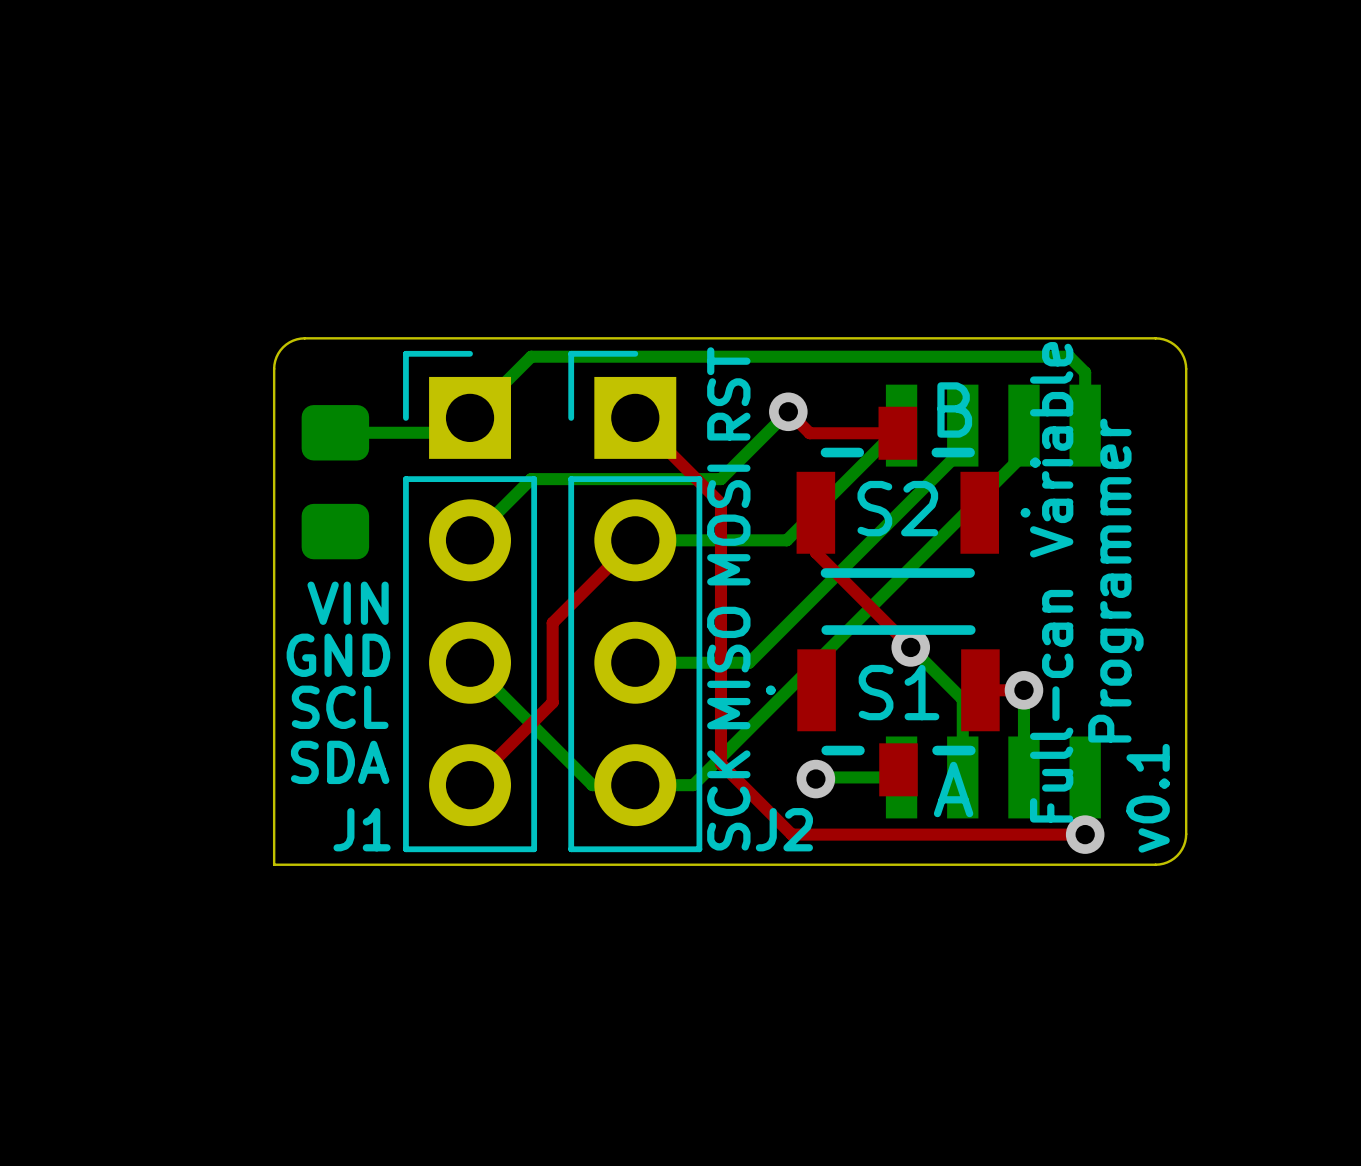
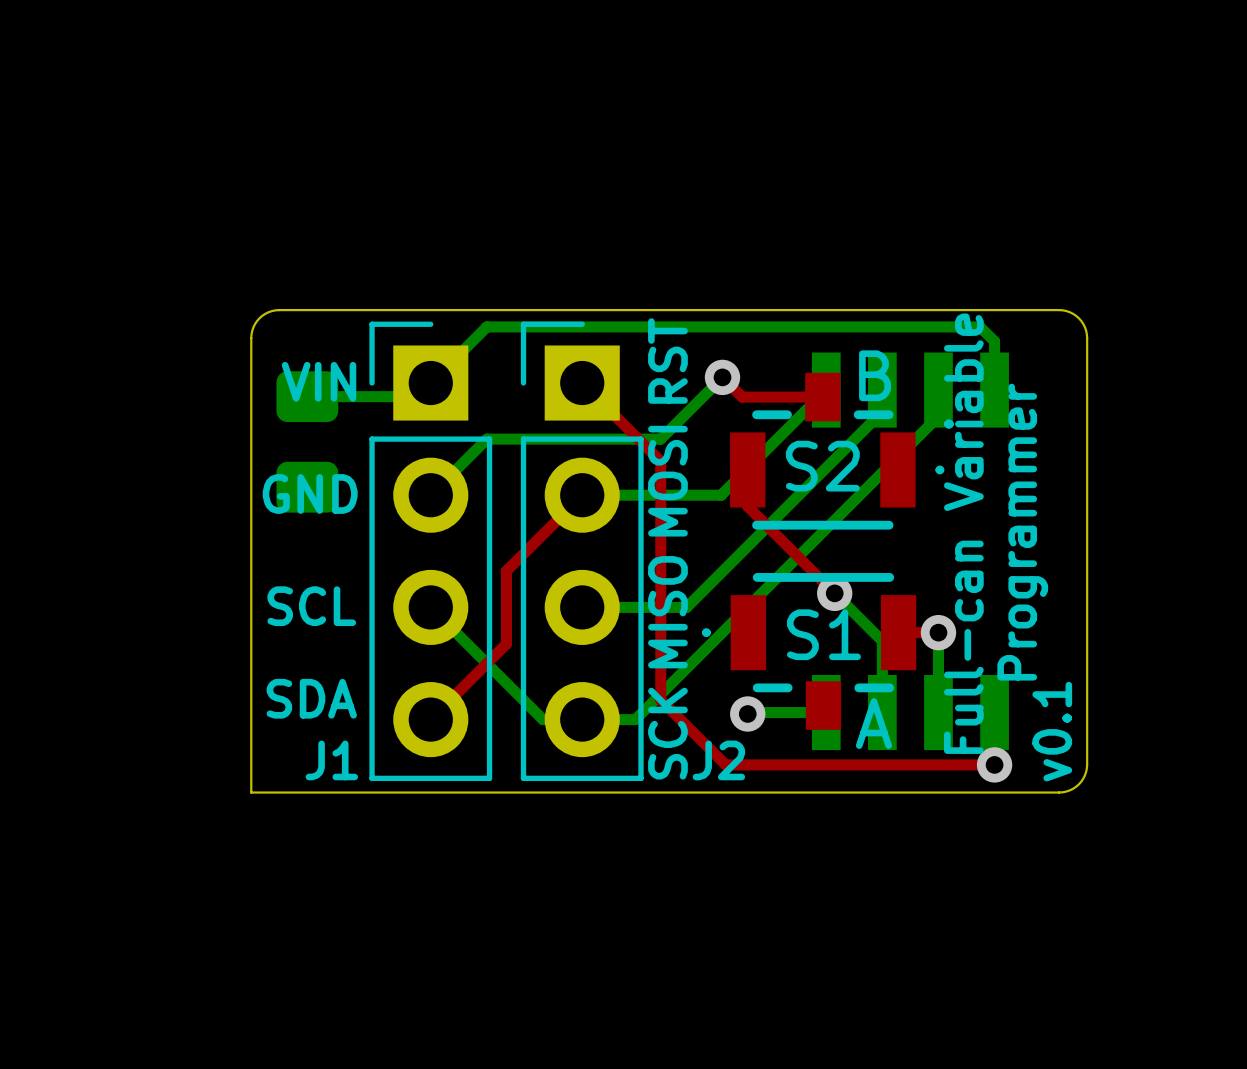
text position: VIN (348, 603) -> VIN (319, 381)
text position: GND (338, 655) -> GND (310, 493)
text position: SCL (340, 707) -> SCL (311, 606)

